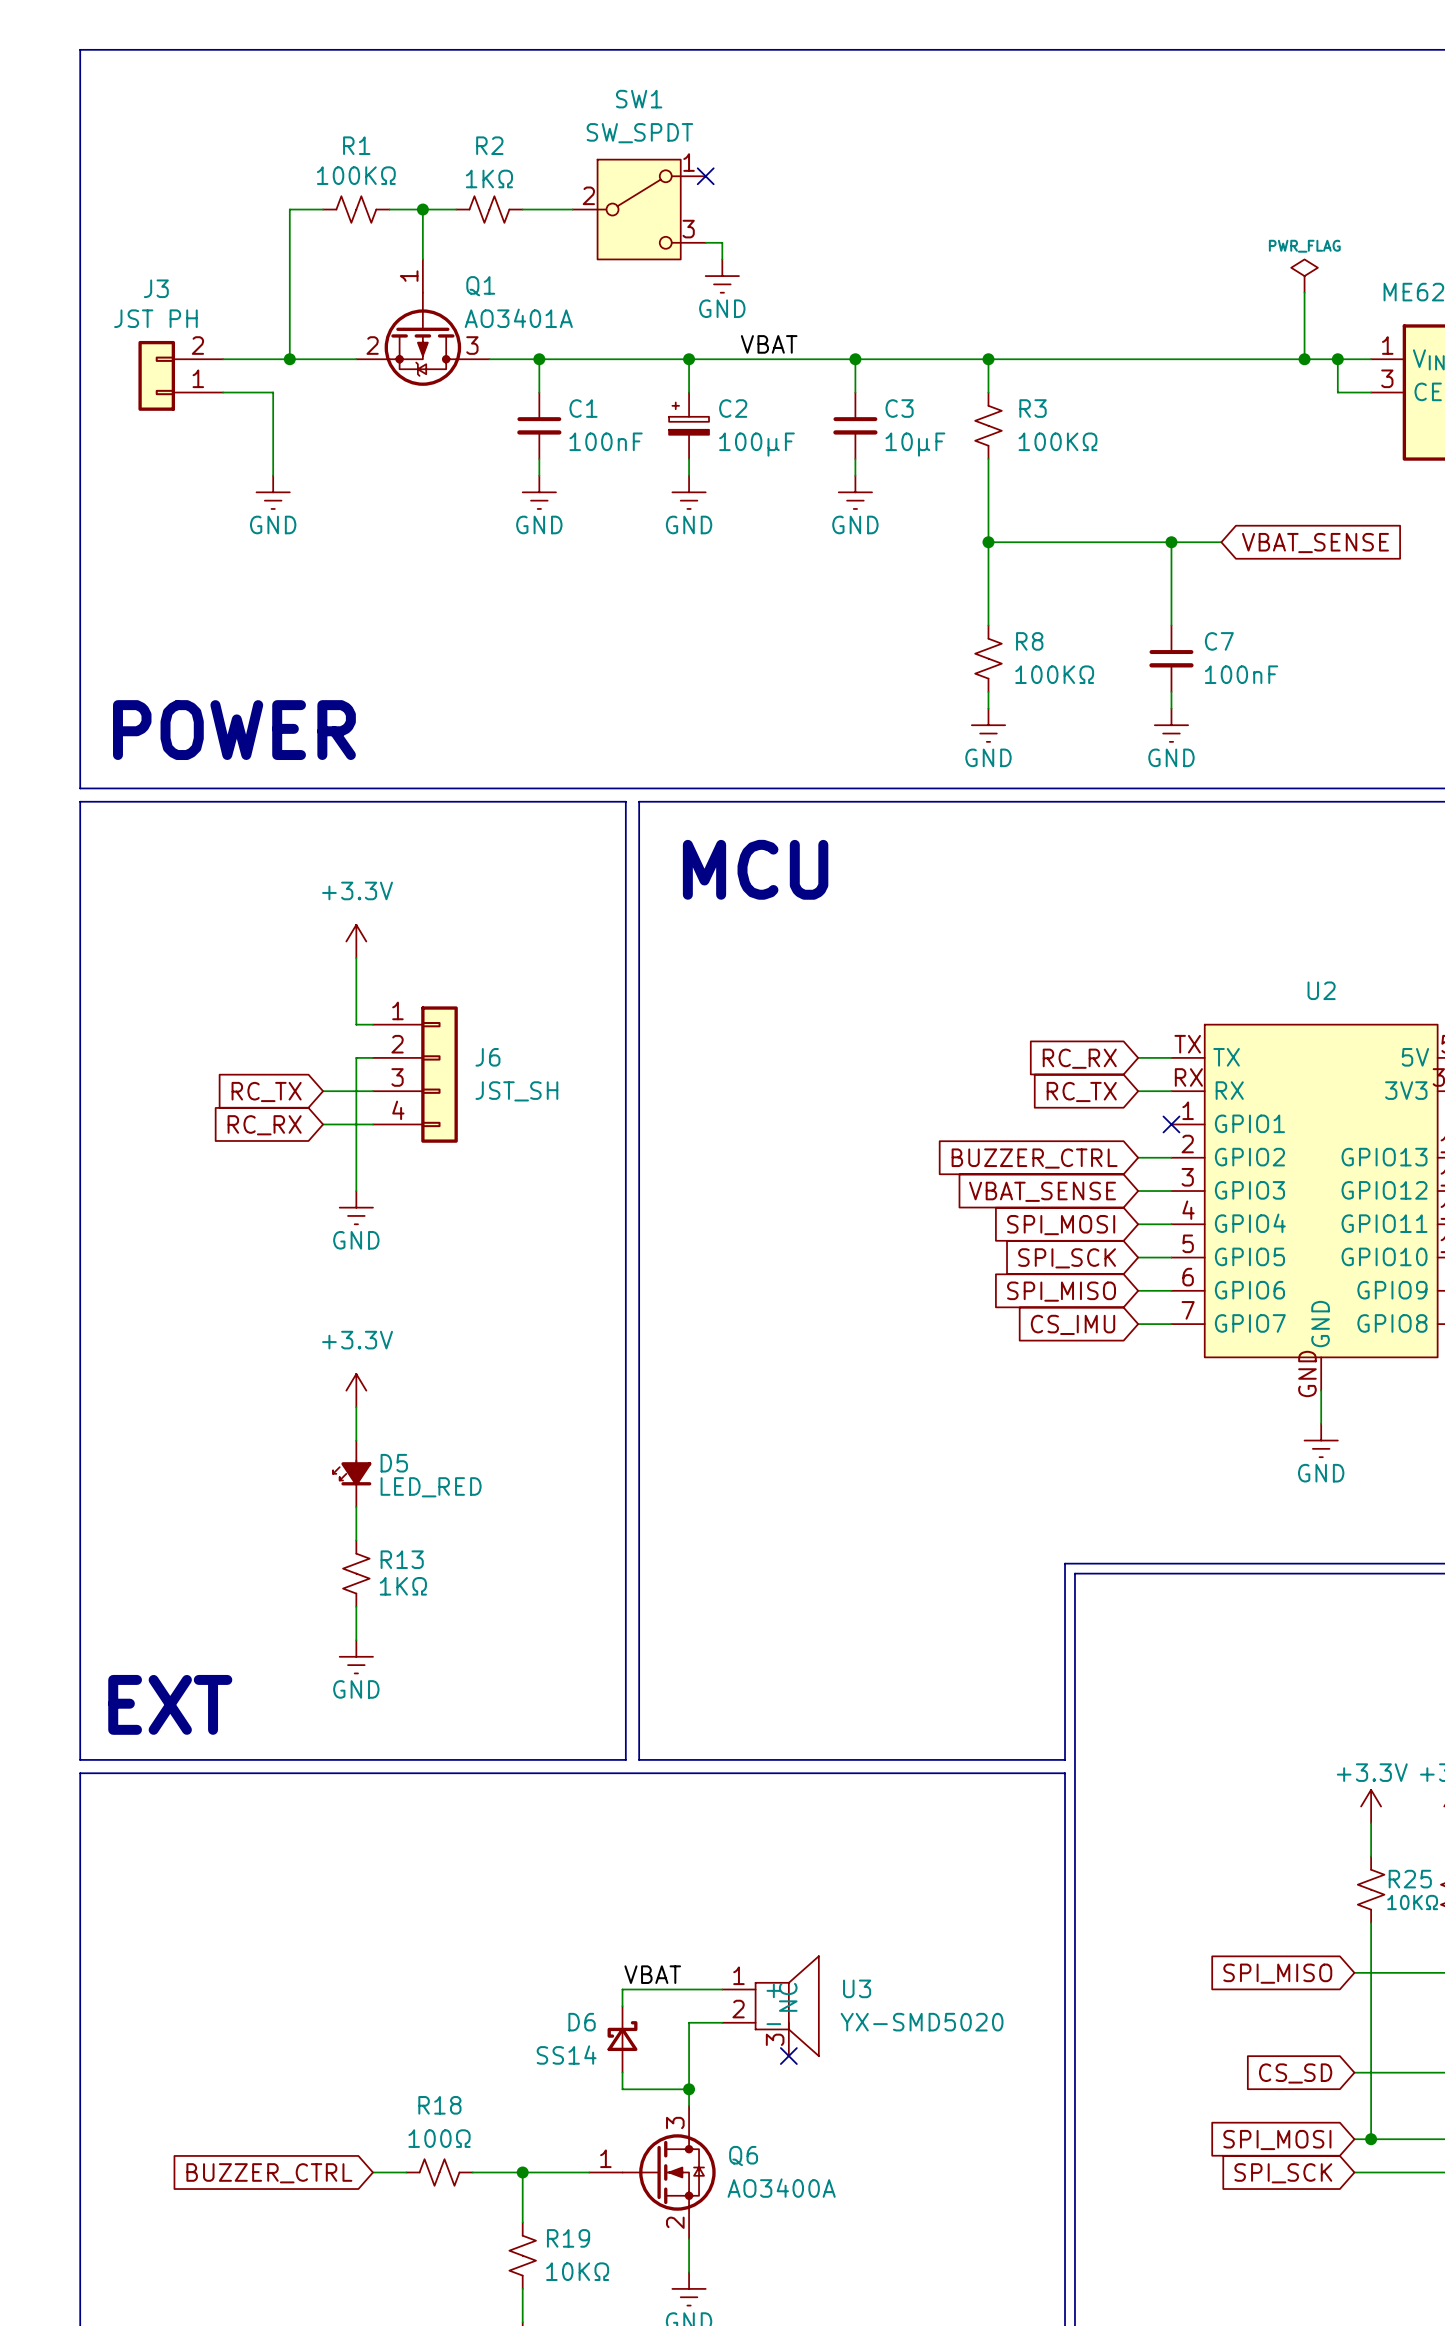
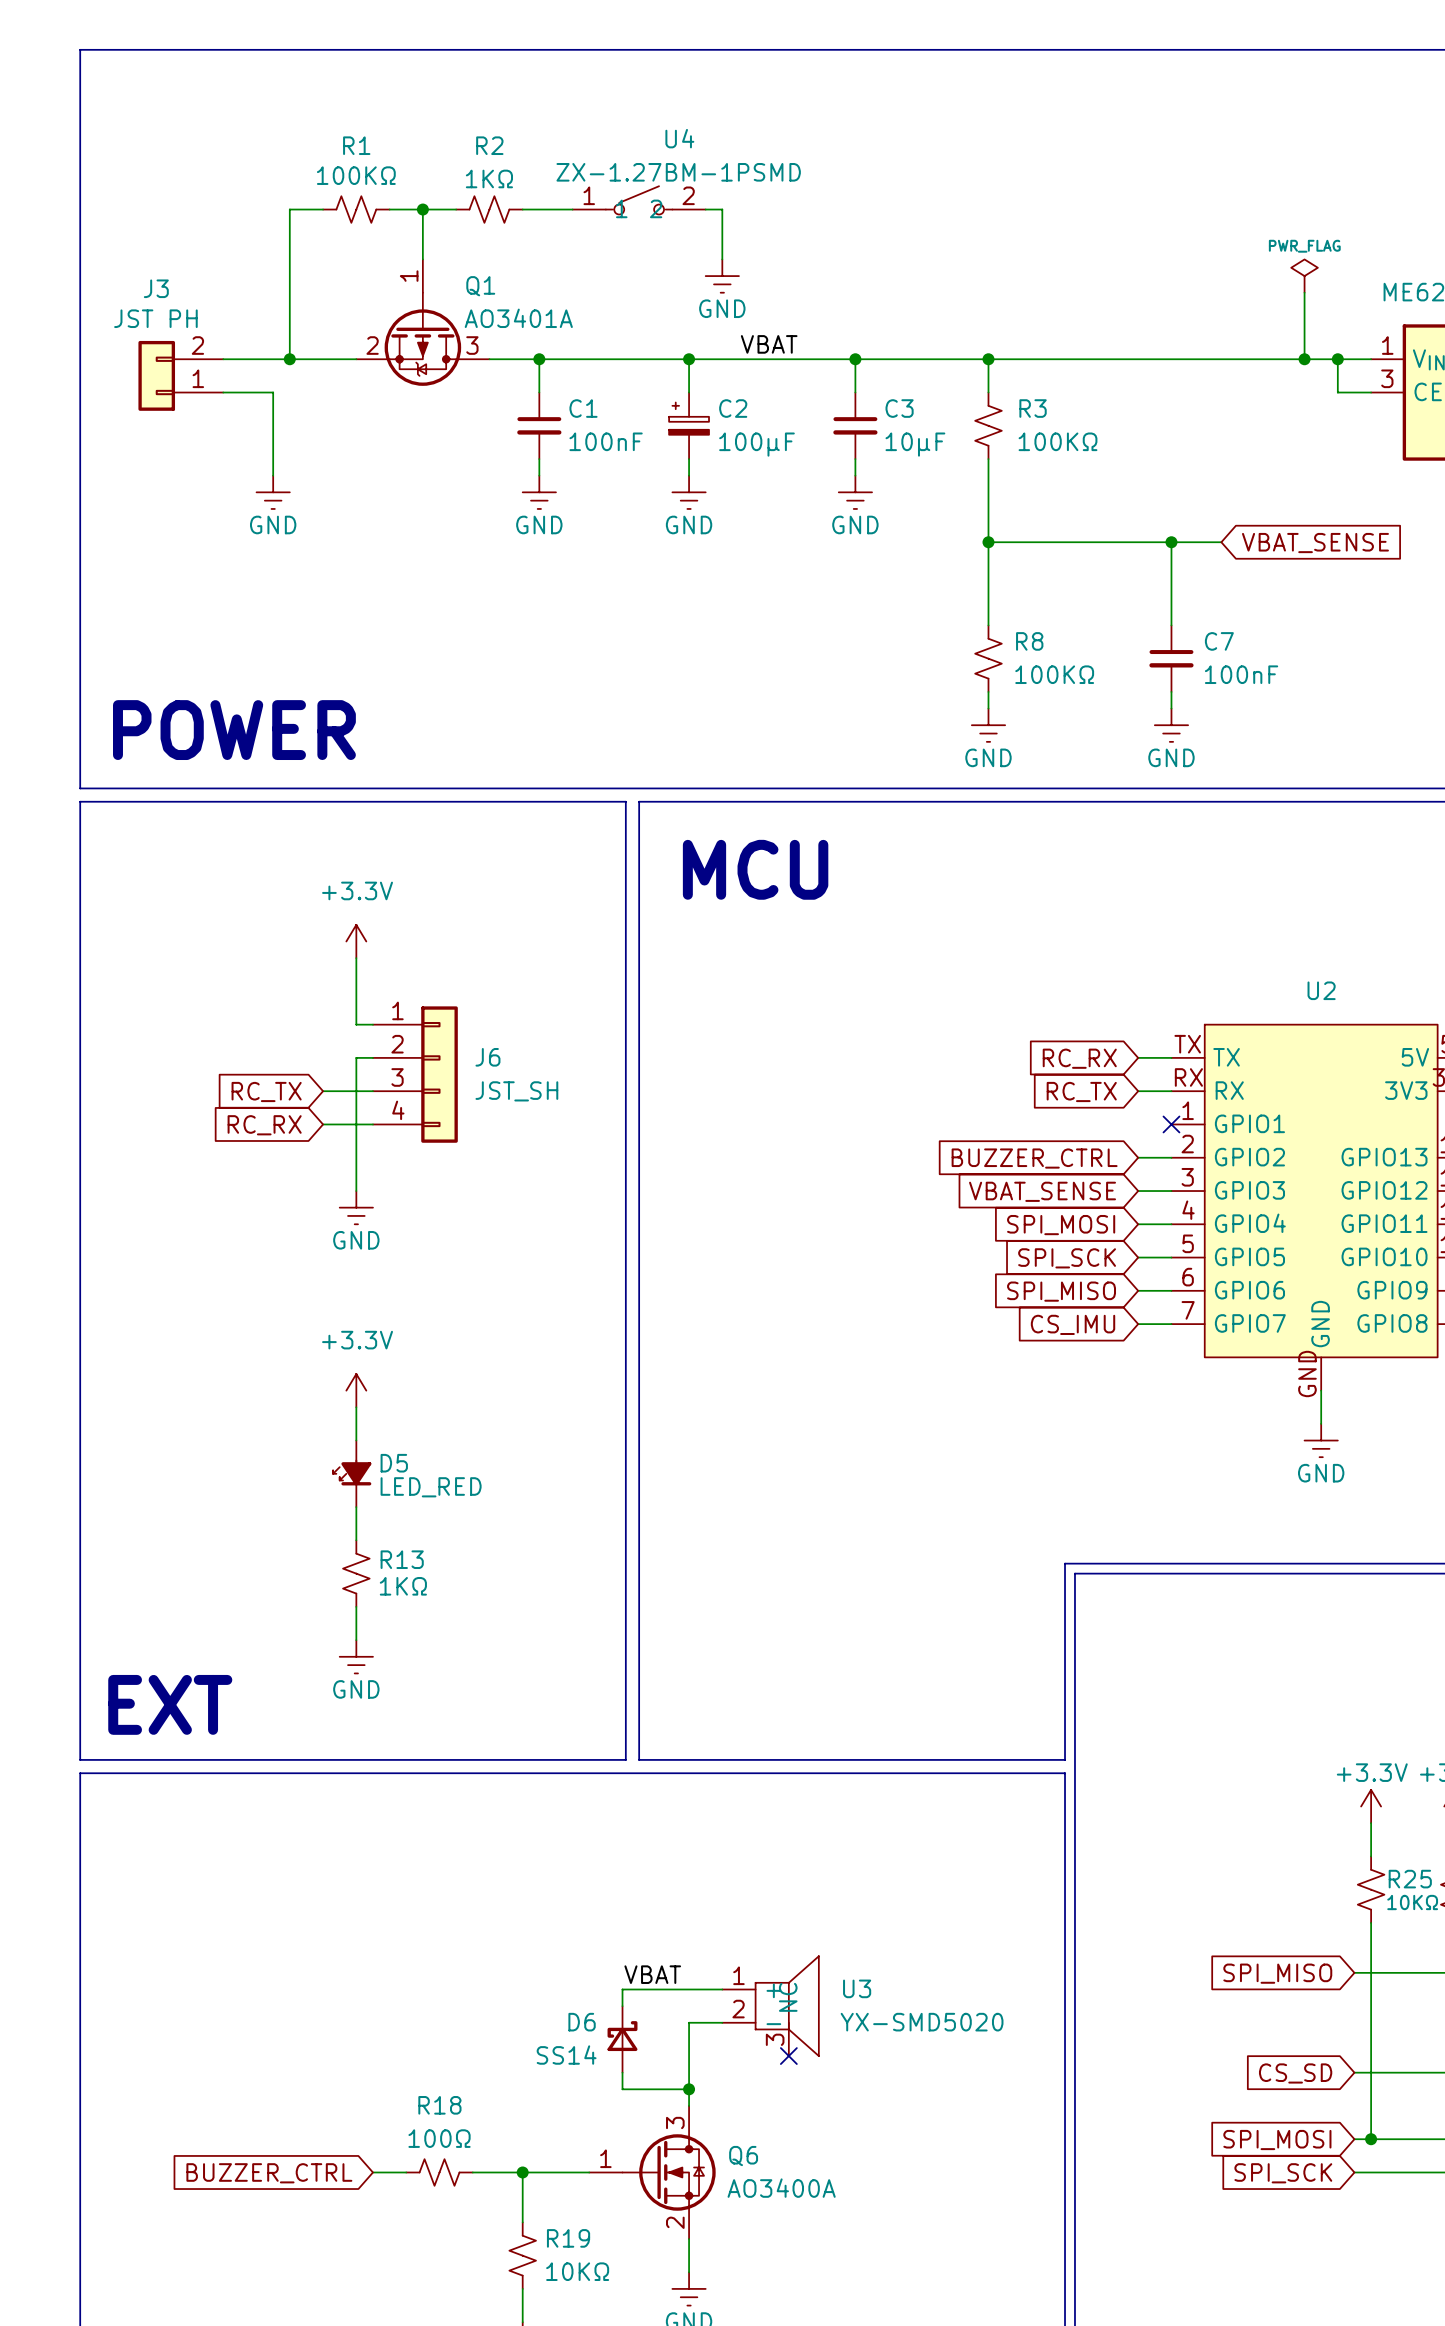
no-connect mark: (705, 176) -> none
U4: none -> ZX-1.27BM-1PSMD (639, 200)
SW1: SW_SPDT (639, 209) -> none
wire: (705, 242) (722, 242) -> (705, 209) (722, 209) (722, 242)

